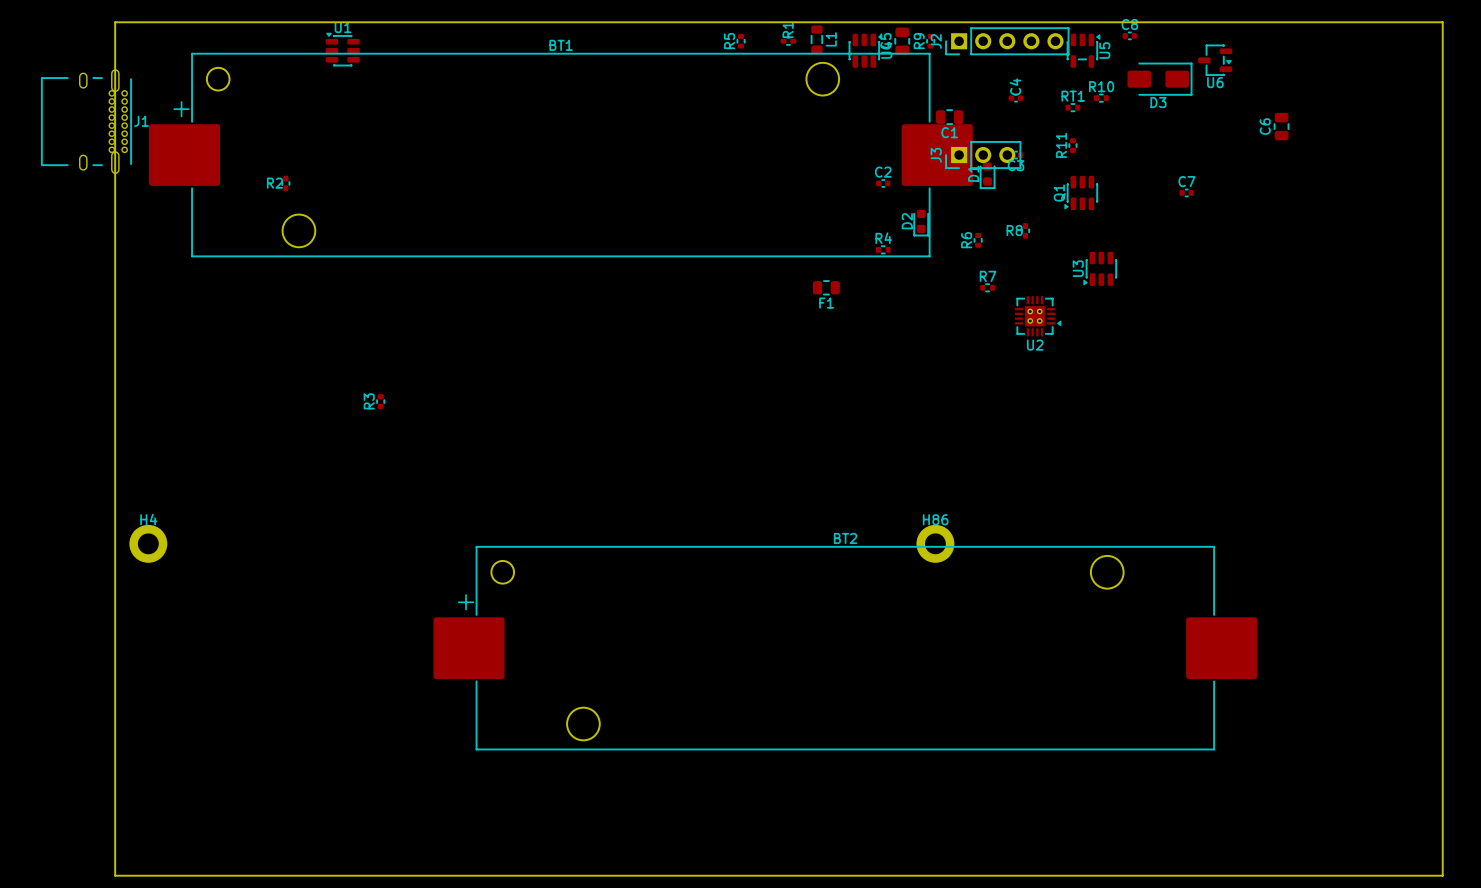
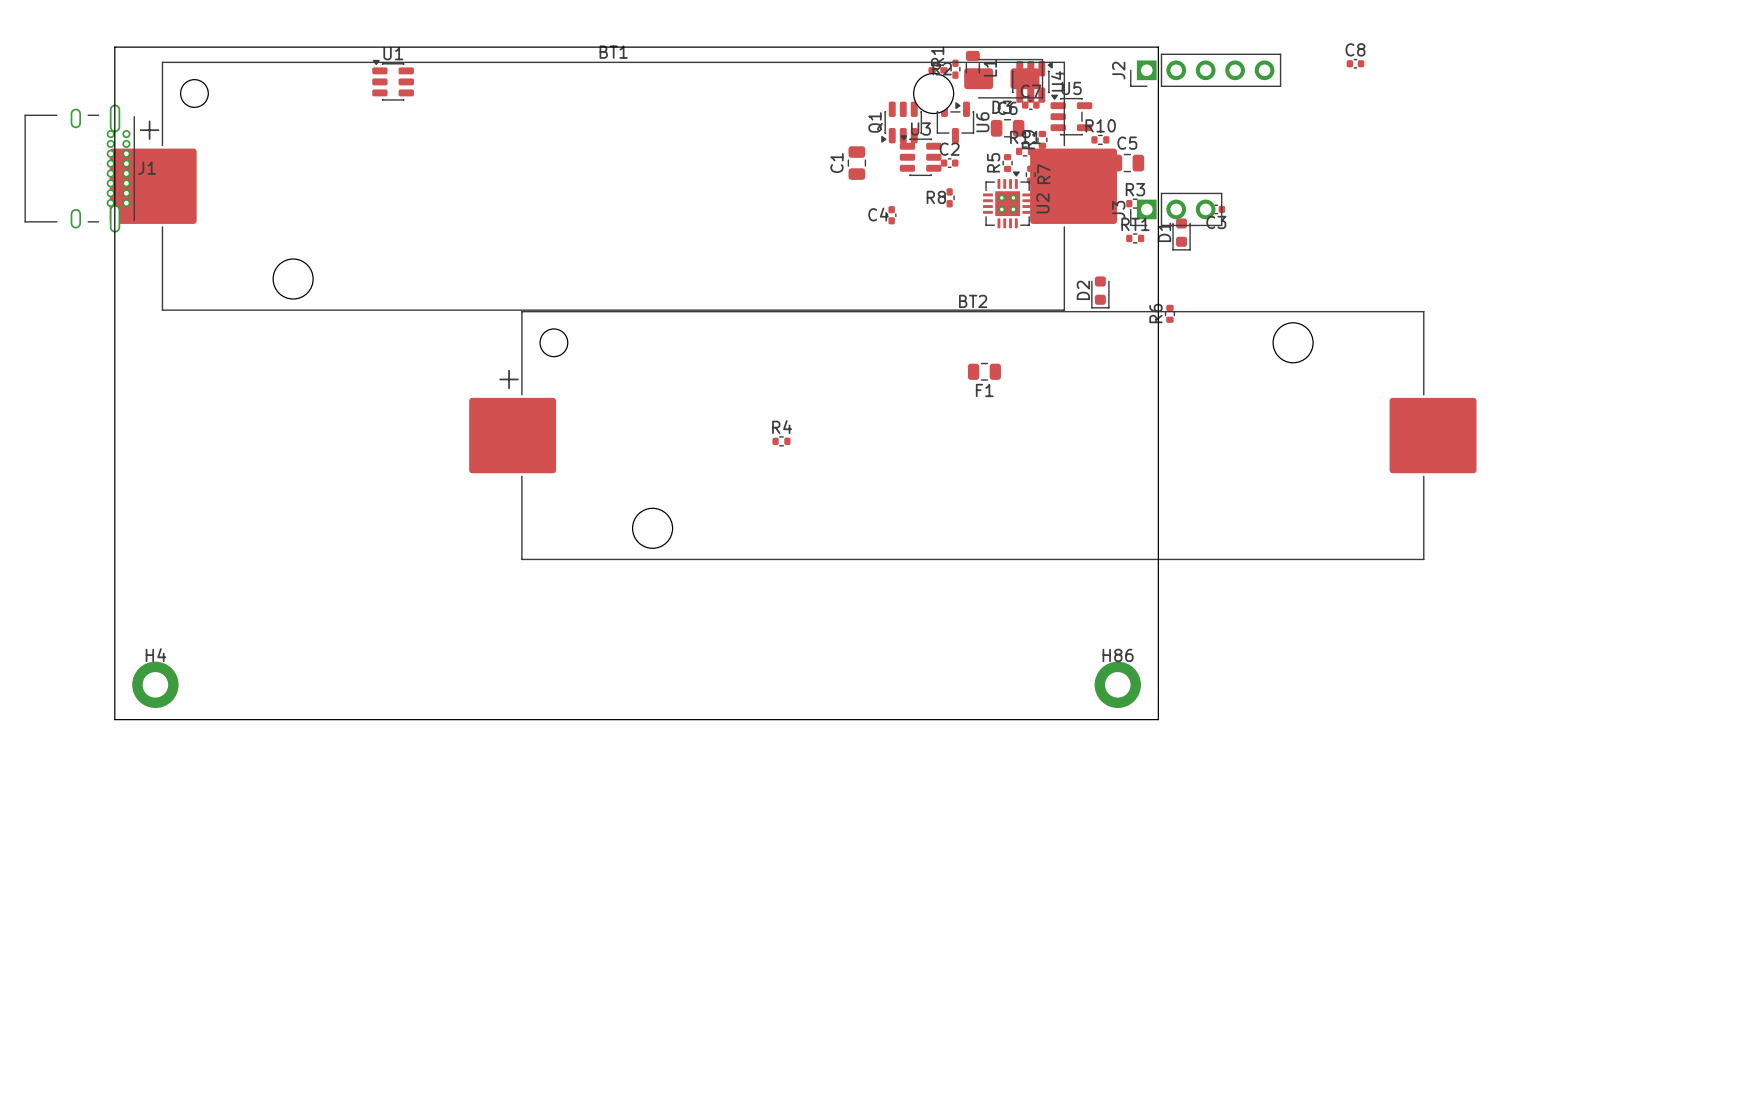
board edge: (968, 22) (1442, 22) (1442, 875) (115, 875) (115, 572) -> (1158, 47) (1158, 719) (114, 719)
R5 position: (741, 41) -> (1007, 163)
C5 rotation: 0° (902, 41) -> 90° clockwise (1127, 163)
C5 position: (902, 41) -> (1127, 163)
R9 position: (930, 41) -> (1042, 139)
U5 rotation: 0° (1083, 50) -> 90° counterclockwise (1071, 115)
U5 position: (1083, 50) -> (1071, 115)
U6 rotation: 0° (1215, 60) -> 90° counterclockwise (955, 122)
U6 position: (1215, 60) -> (955, 122)
D3 position: (1159, 79) -> (1003, 78)
C4 rotation: 0° (1016, 98) -> 90° clockwise (891, 215)
C4 position: (1016, 98) -> (891, 215)
R10 position: (1101, 98) -> (1100, 139)
RT1 position: (1072, 107) -> (1135, 238)
C1 rotation: 0° (949, 117) -> 90° clockwise (856, 163)
C1 position: (949, 117) -> (856, 163)
C6 rotation: 0° (1281, 126) -> 90° clockwise (1007, 128)
C6 position: (1281, 126) -> (1007, 128)
R11 rotation: 0° (1072, 145) -> 90° clockwise (1025, 151)
R11 position: (1072, 145) -> (1025, 151)
BT1 position: (560, 155) -> (613, 186)
R2 position: (285, 183) -> (955, 69)
C2 position: (883, 183) -> (949, 163)
Q1 position: (1081, 192) -> (901, 122)
C7 position: (1186, 192) -> (1030, 105)
R8 position: (1025, 230) -> (949, 197)
R4 position: (883, 249) -> (781, 441)
U3 rotation: 0° (1100, 268) -> 90° clockwise (920, 155)
U3 position: (1100, 268) -> (920, 155)
R7 rotation: 0° (987, 287) -> 90° clockwise (1030, 174)
R7 position: (987, 287) -> (1030, 174)
U2 rotation: 0° (1038, 316) -> 90° counterclockwise (1007, 199)
U2 position: (1038, 316) -> (1007, 199)
R3 rotation: 0° (380, 401) -> 90° clockwise (1135, 203)
R3 position: (380, 401) -> (1135, 203)
BT2 position: (845, 648) -> (972, 435)

